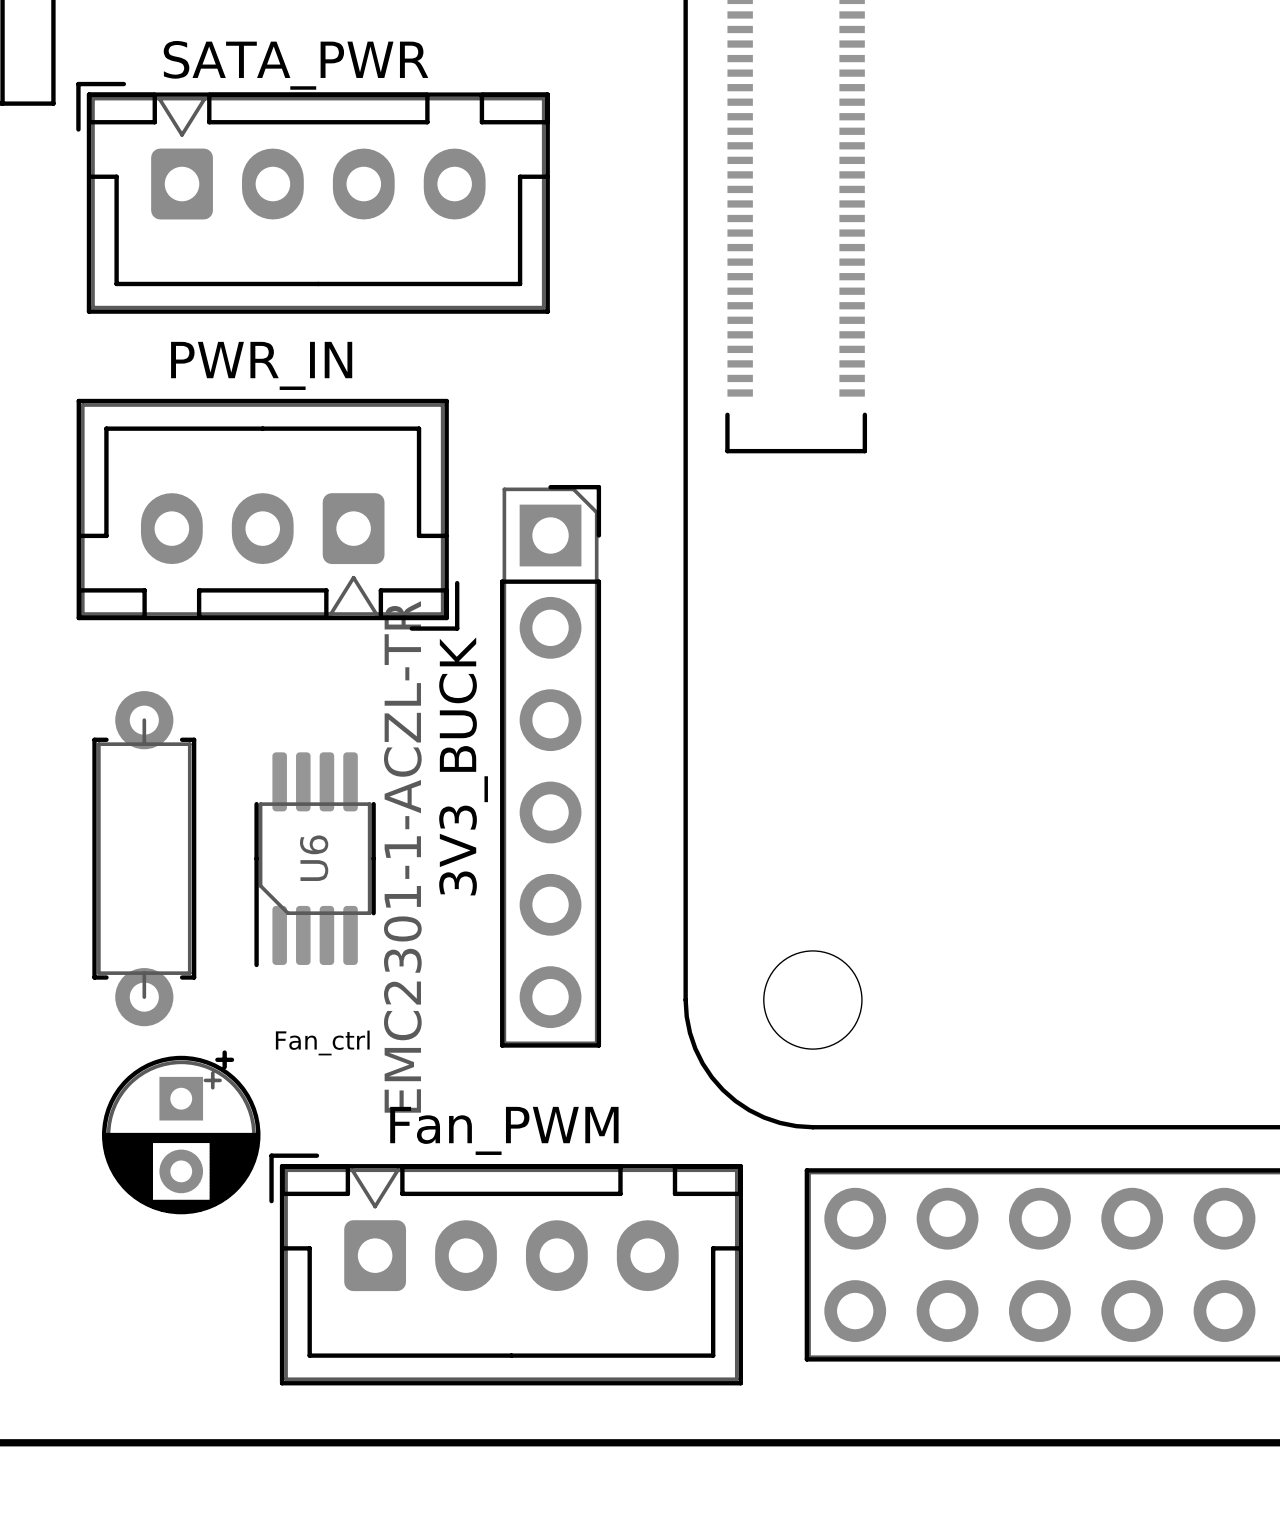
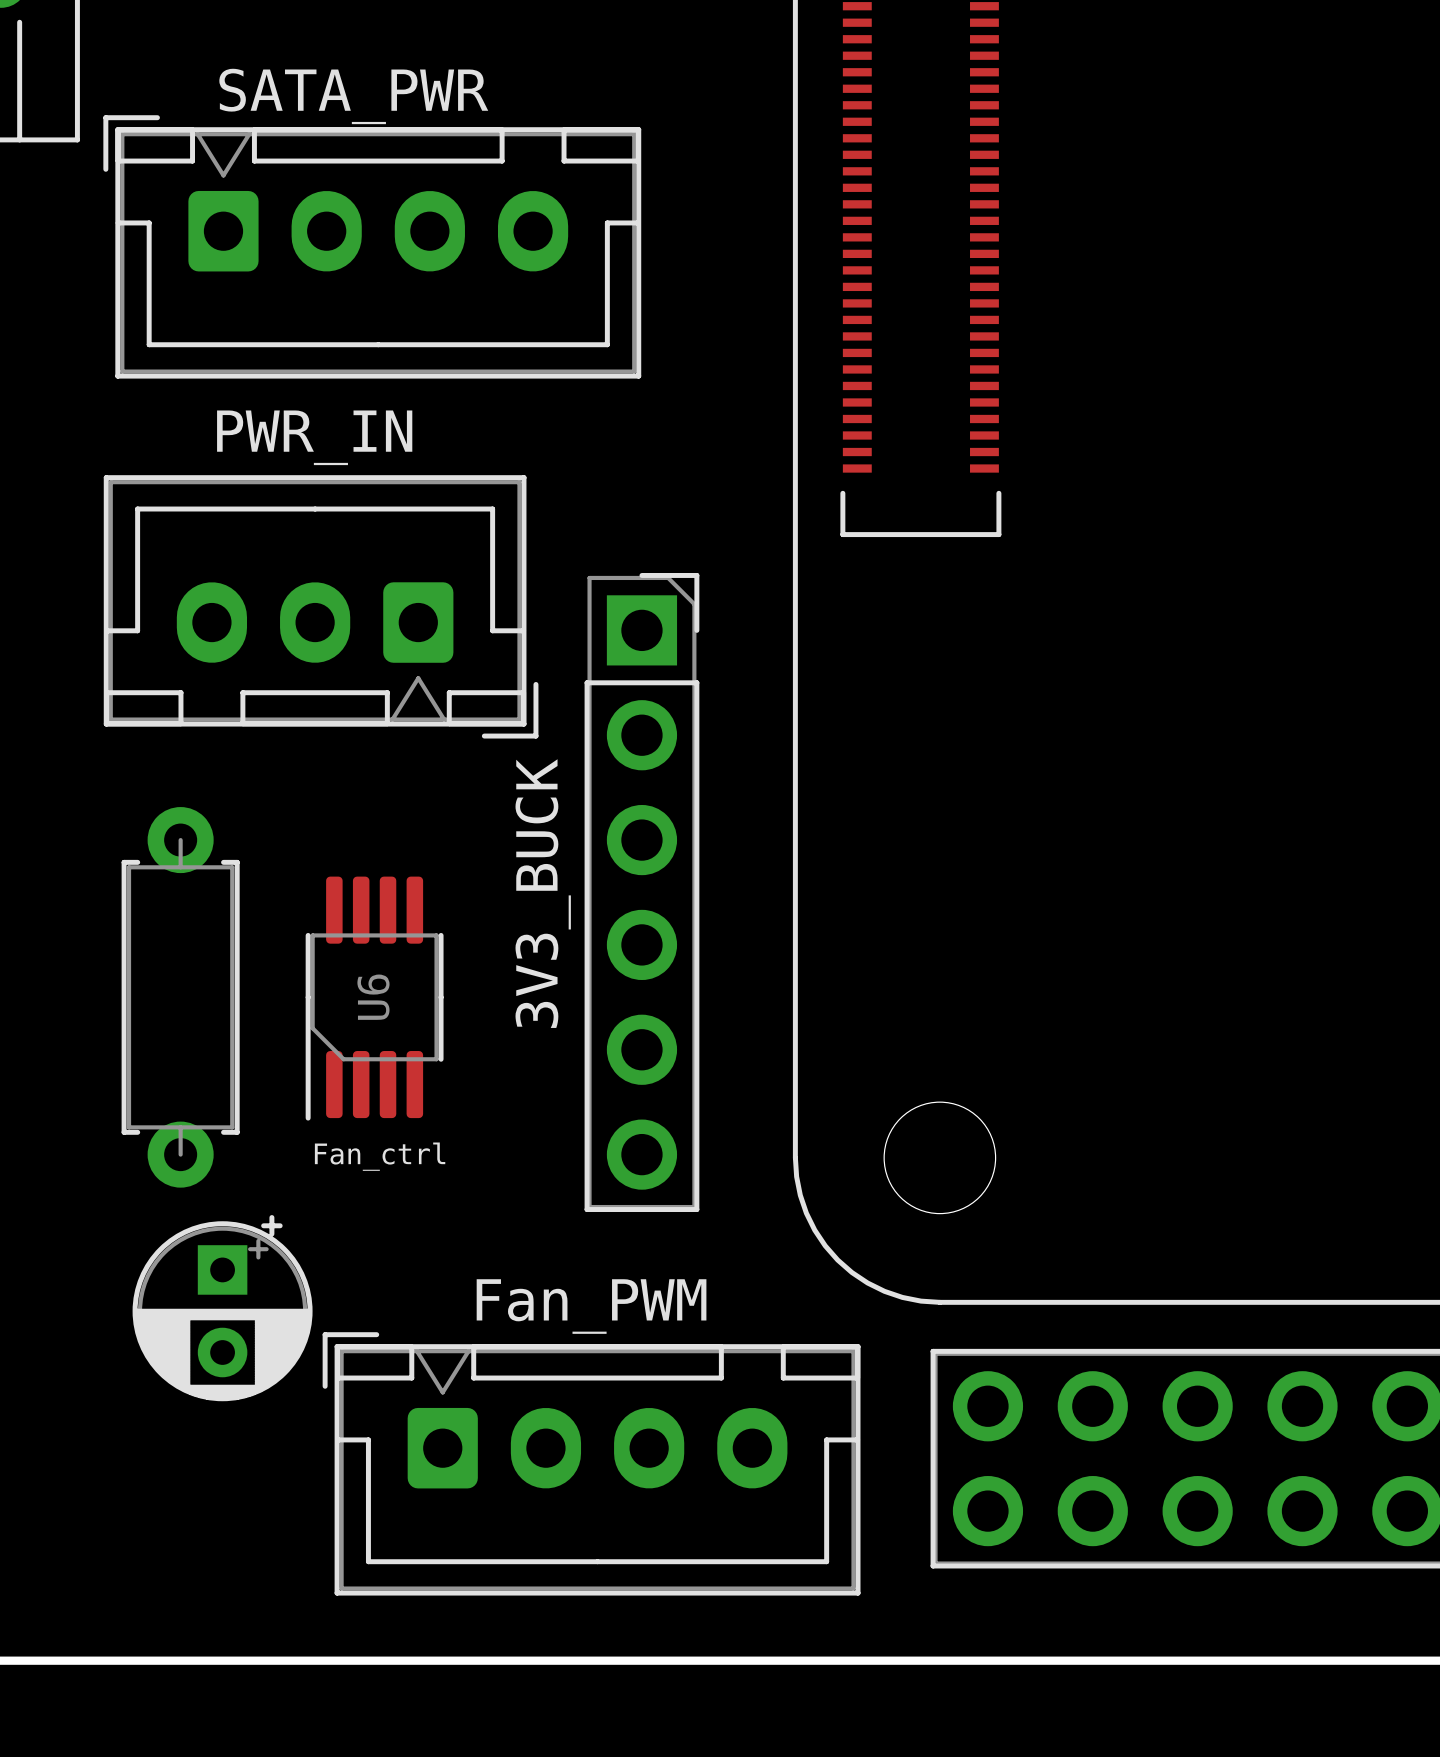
U6 value: EMC2301-1-ACZL-TR (402, 856) -> none
text position: Fan_ctrl (322, 1043) -> Fan_ctrl (380, 1156)

